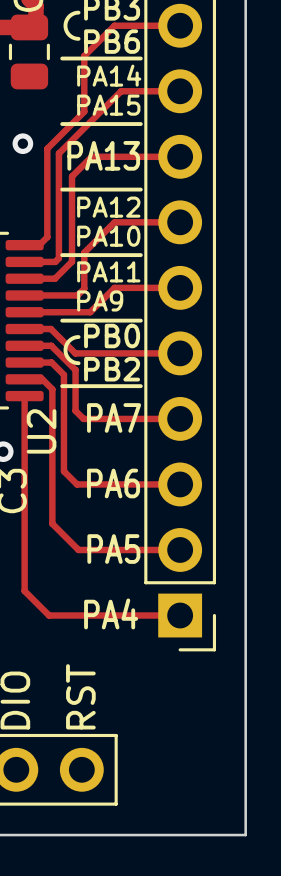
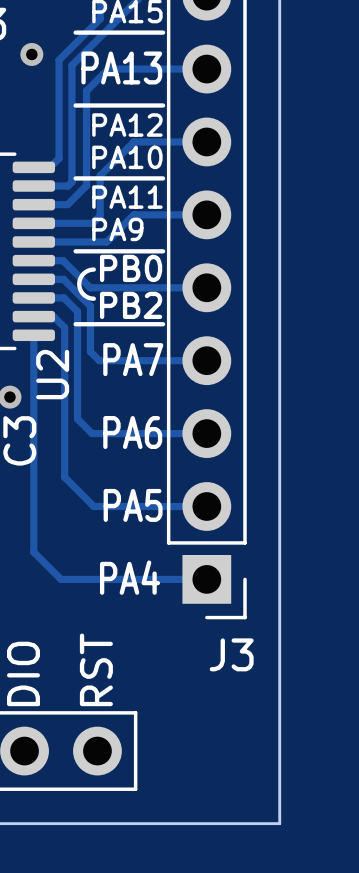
J3 name: none -> J3 (231, 654)

